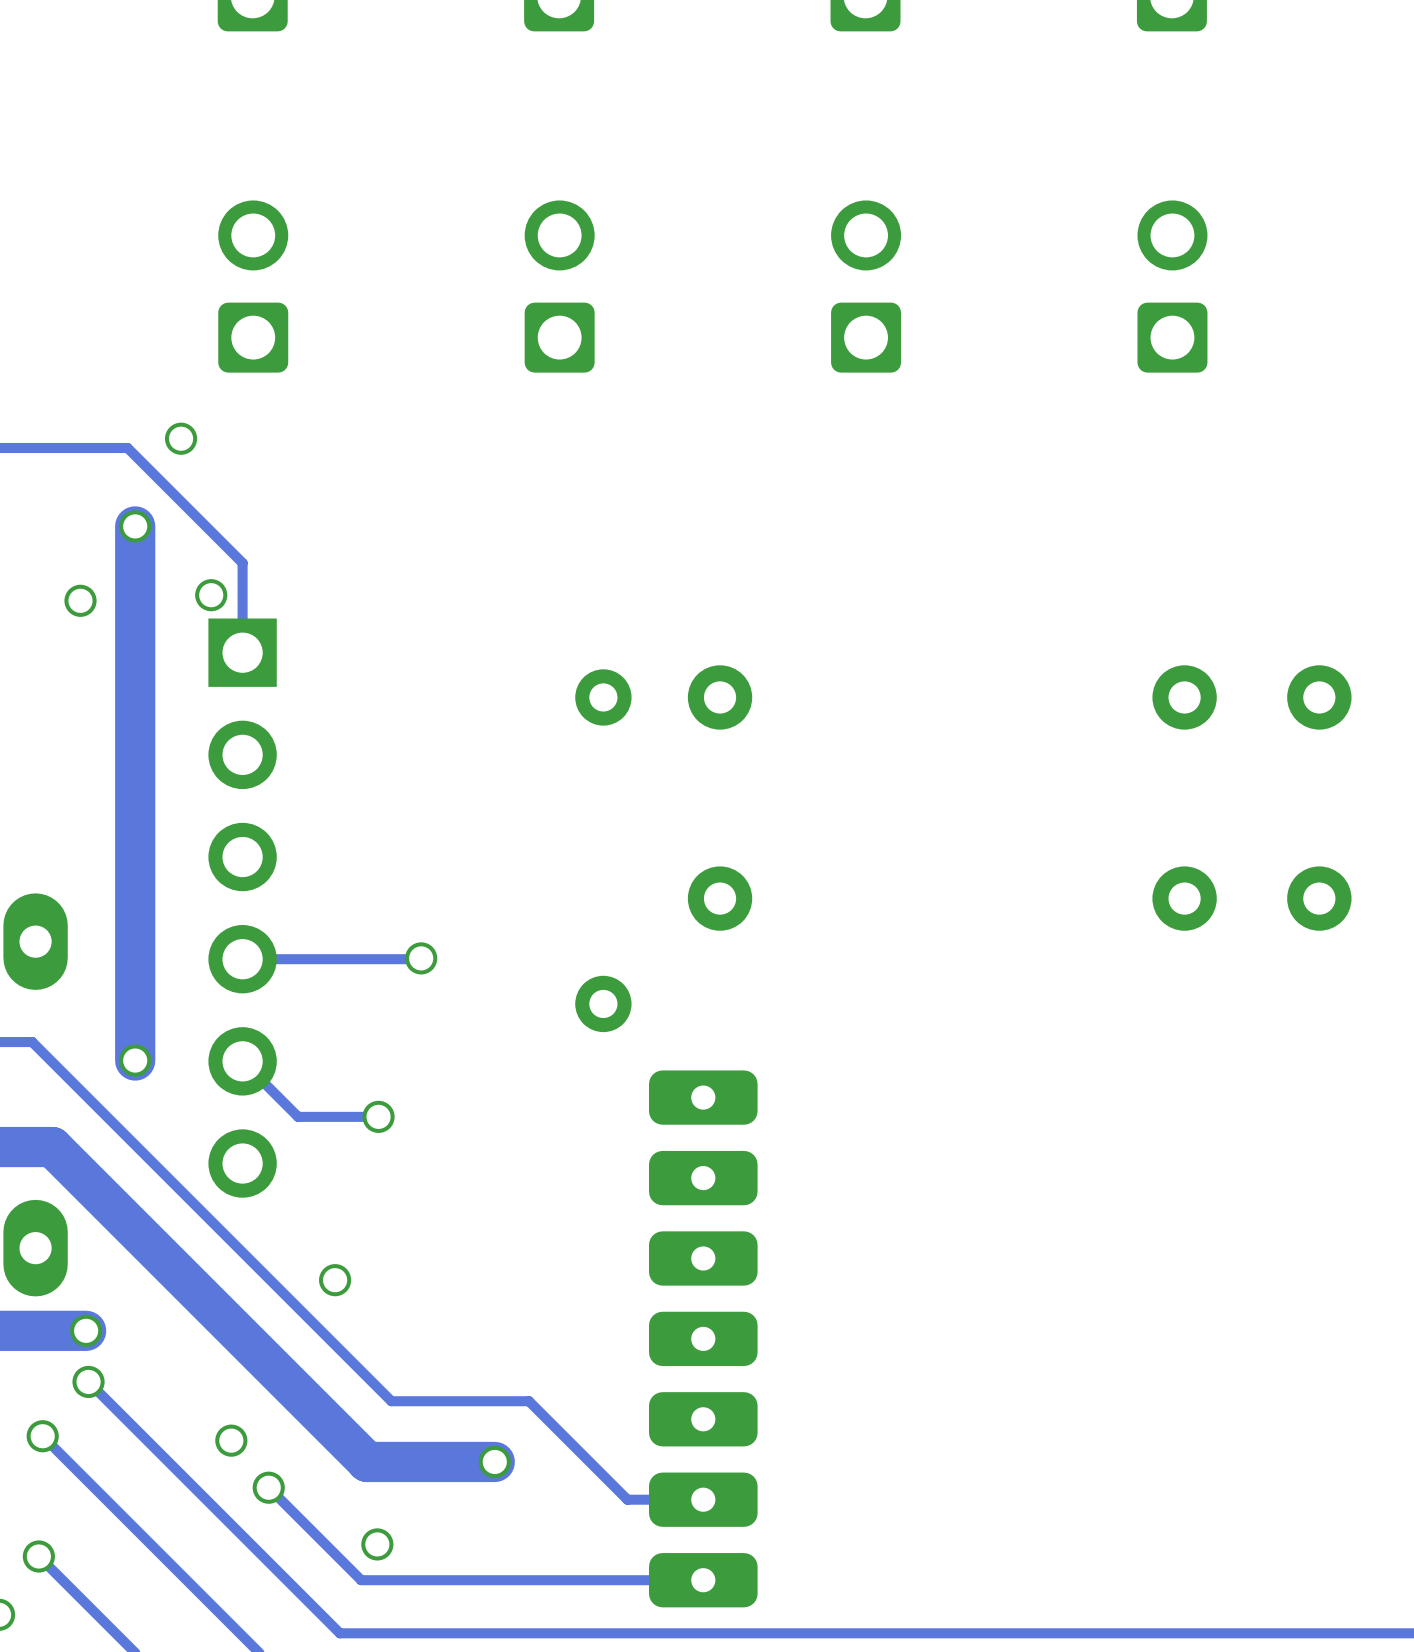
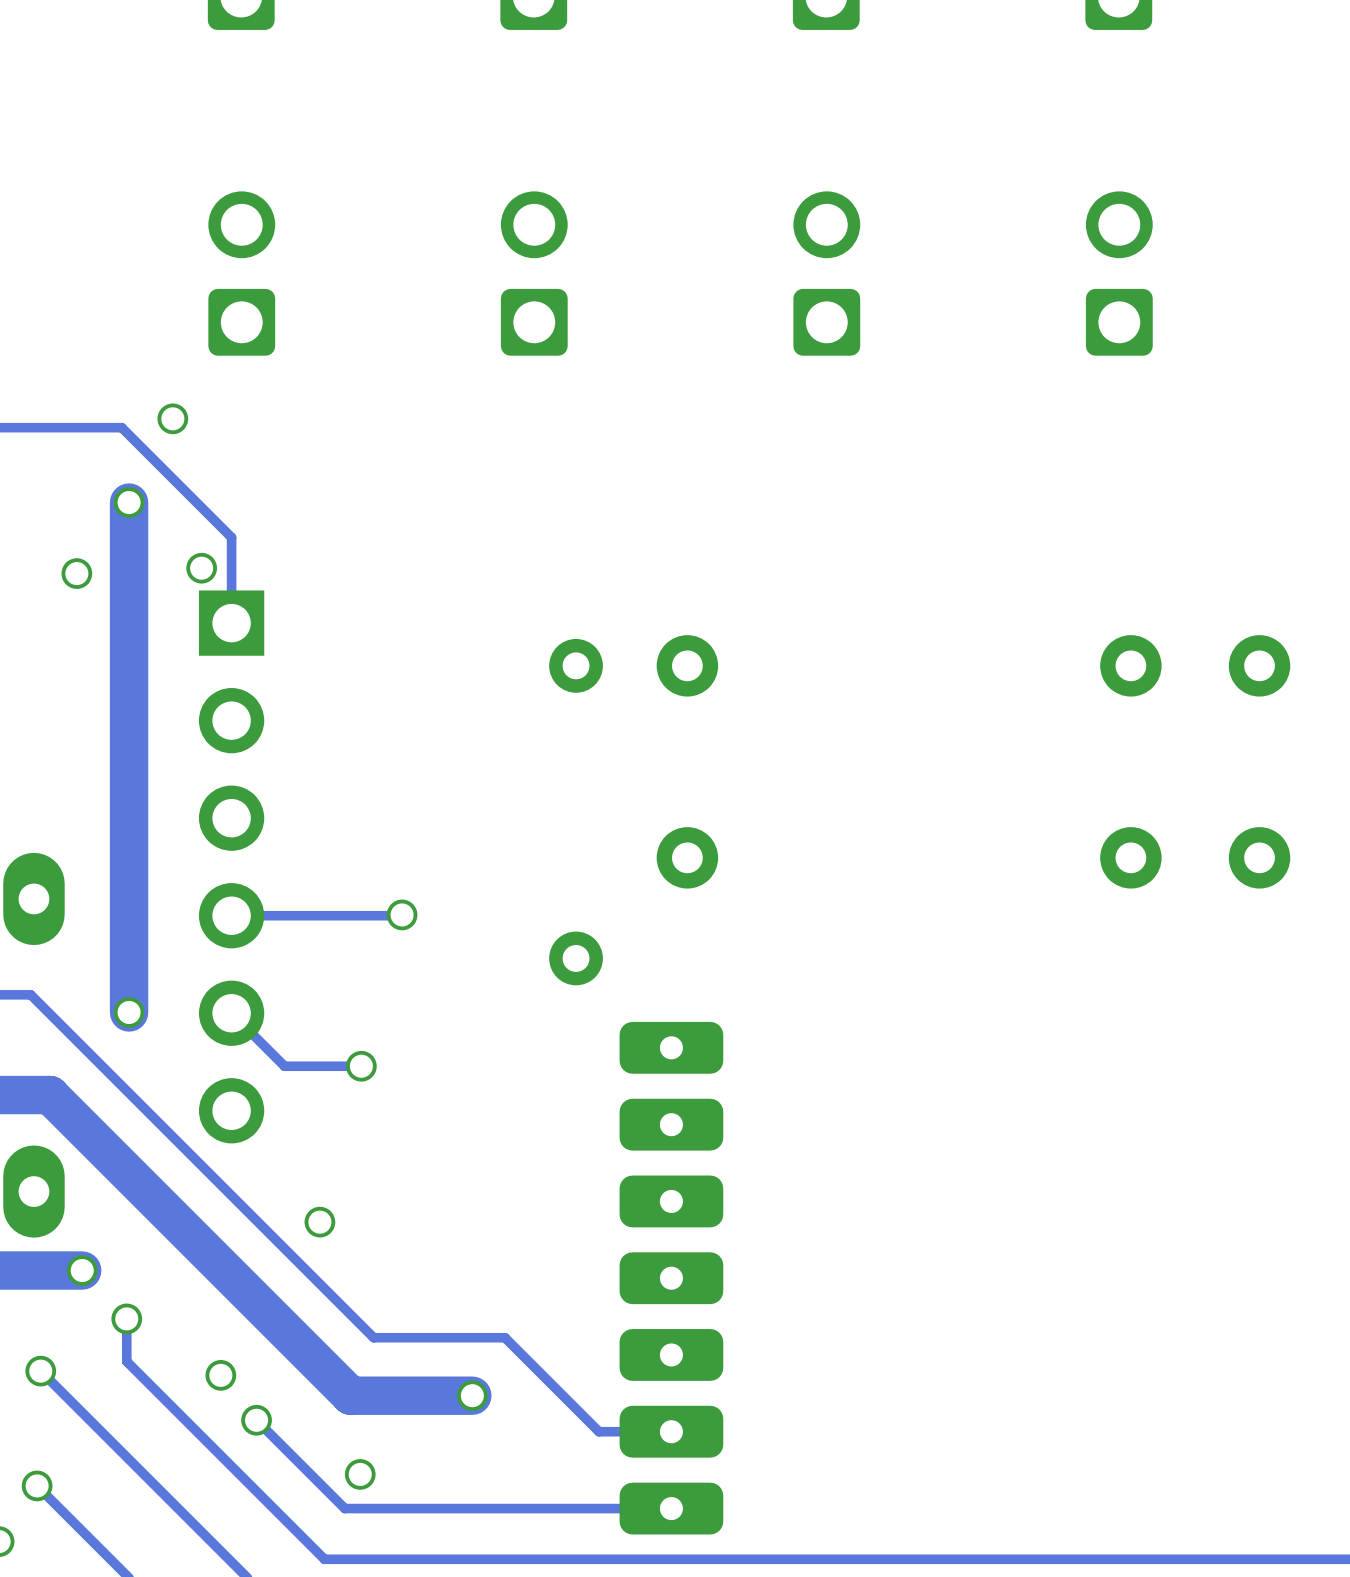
track: (88, 1381) (132, 1426) -> (126, 1318) (126, 1361)
via position: (88, 1381) -> (126, 1318)

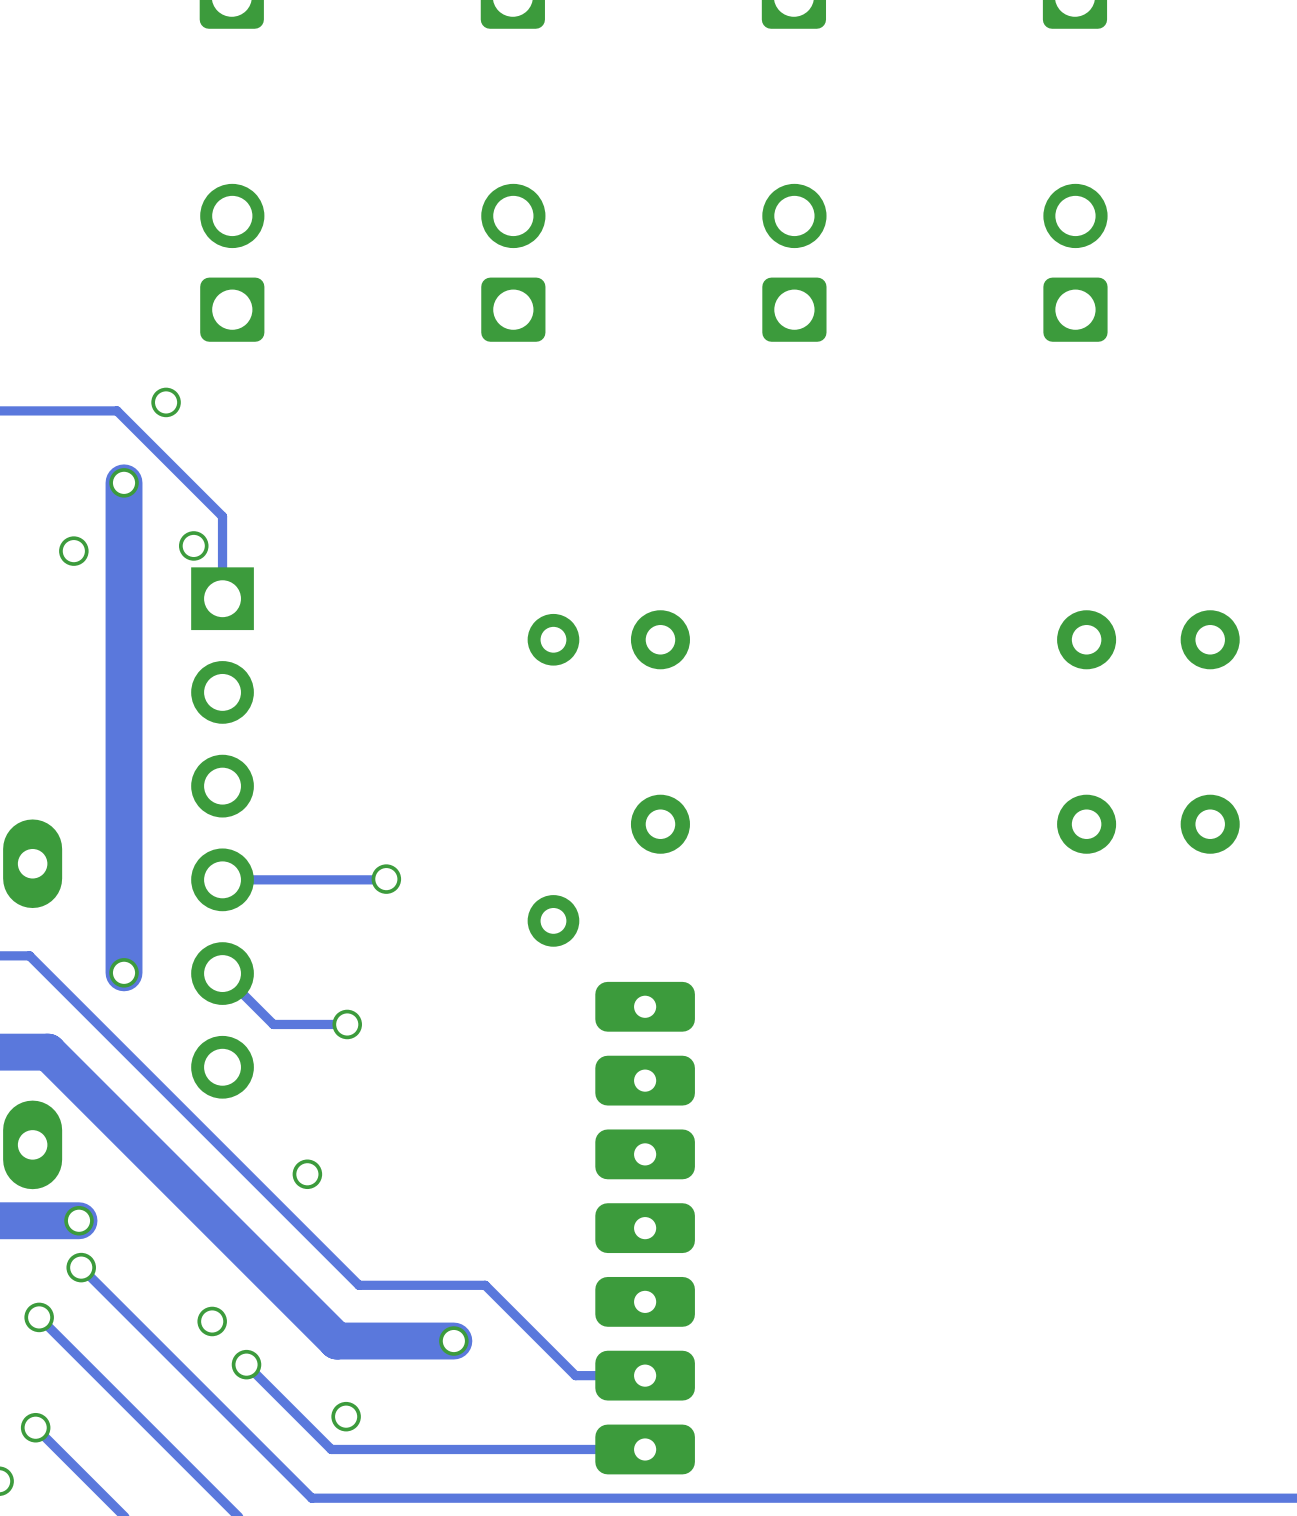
track: (126, 1318) (126, 1361) -> (81, 1267) (121, 1308)
via position: (126, 1318) -> (81, 1267)

